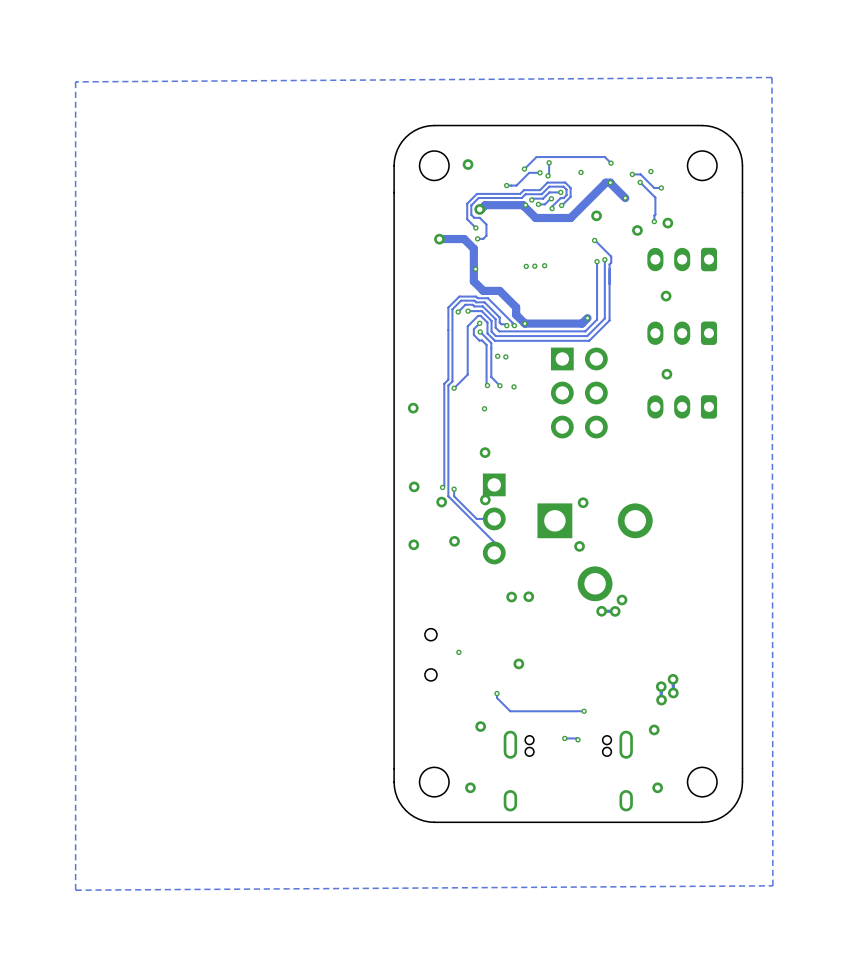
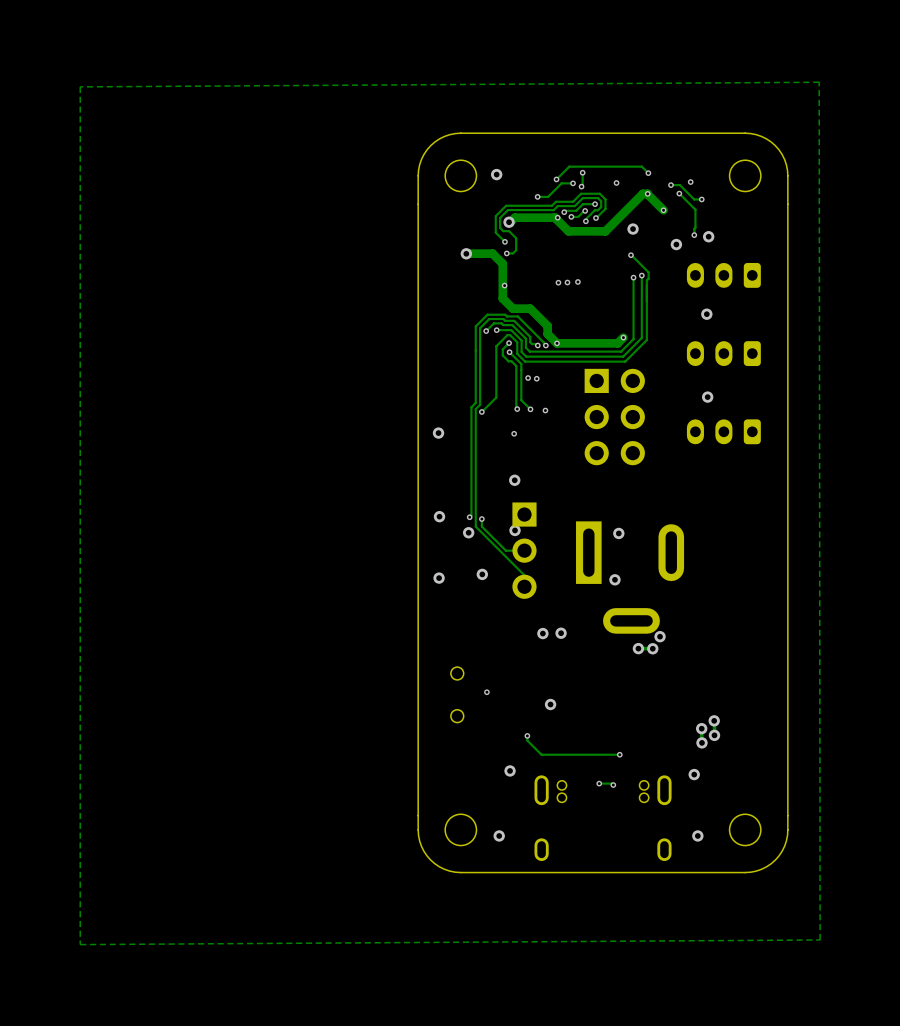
part footprint: [537, 503, 653, 602] -> [576, 521, 685, 634]

